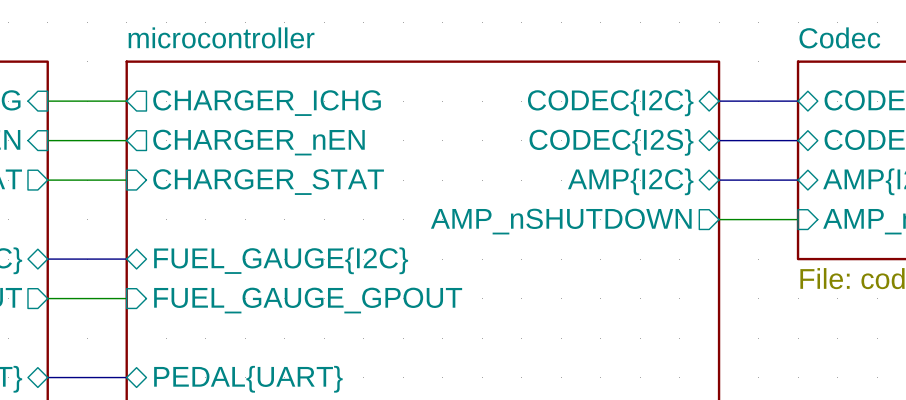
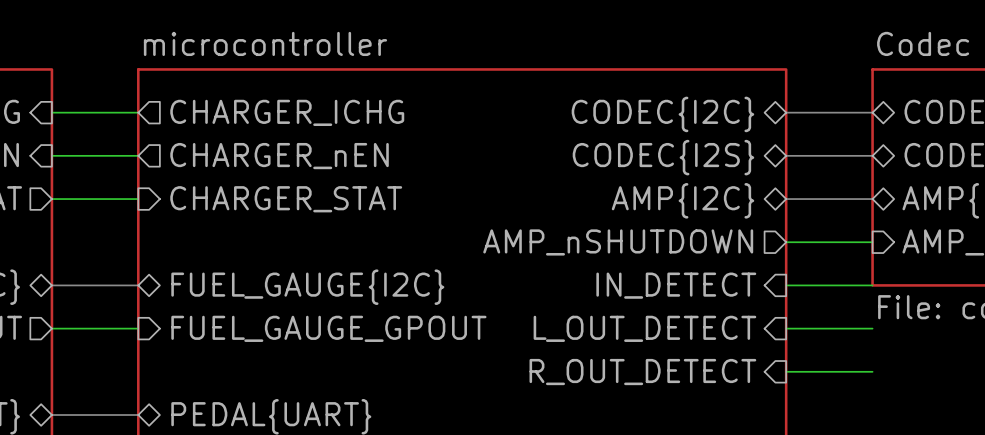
wire: none -> (786, 285) (872, 285)
sheet pin: none -> IN_DETECT (676, 285)
wire: none -> (786, 328) (872, 328)
sheet pin: none -> L_OUT_DETECT (644, 328)
wire: none -> (786, 371) (872, 371)
sheet pin: none -> R_OUT_DETECT (642, 372)

